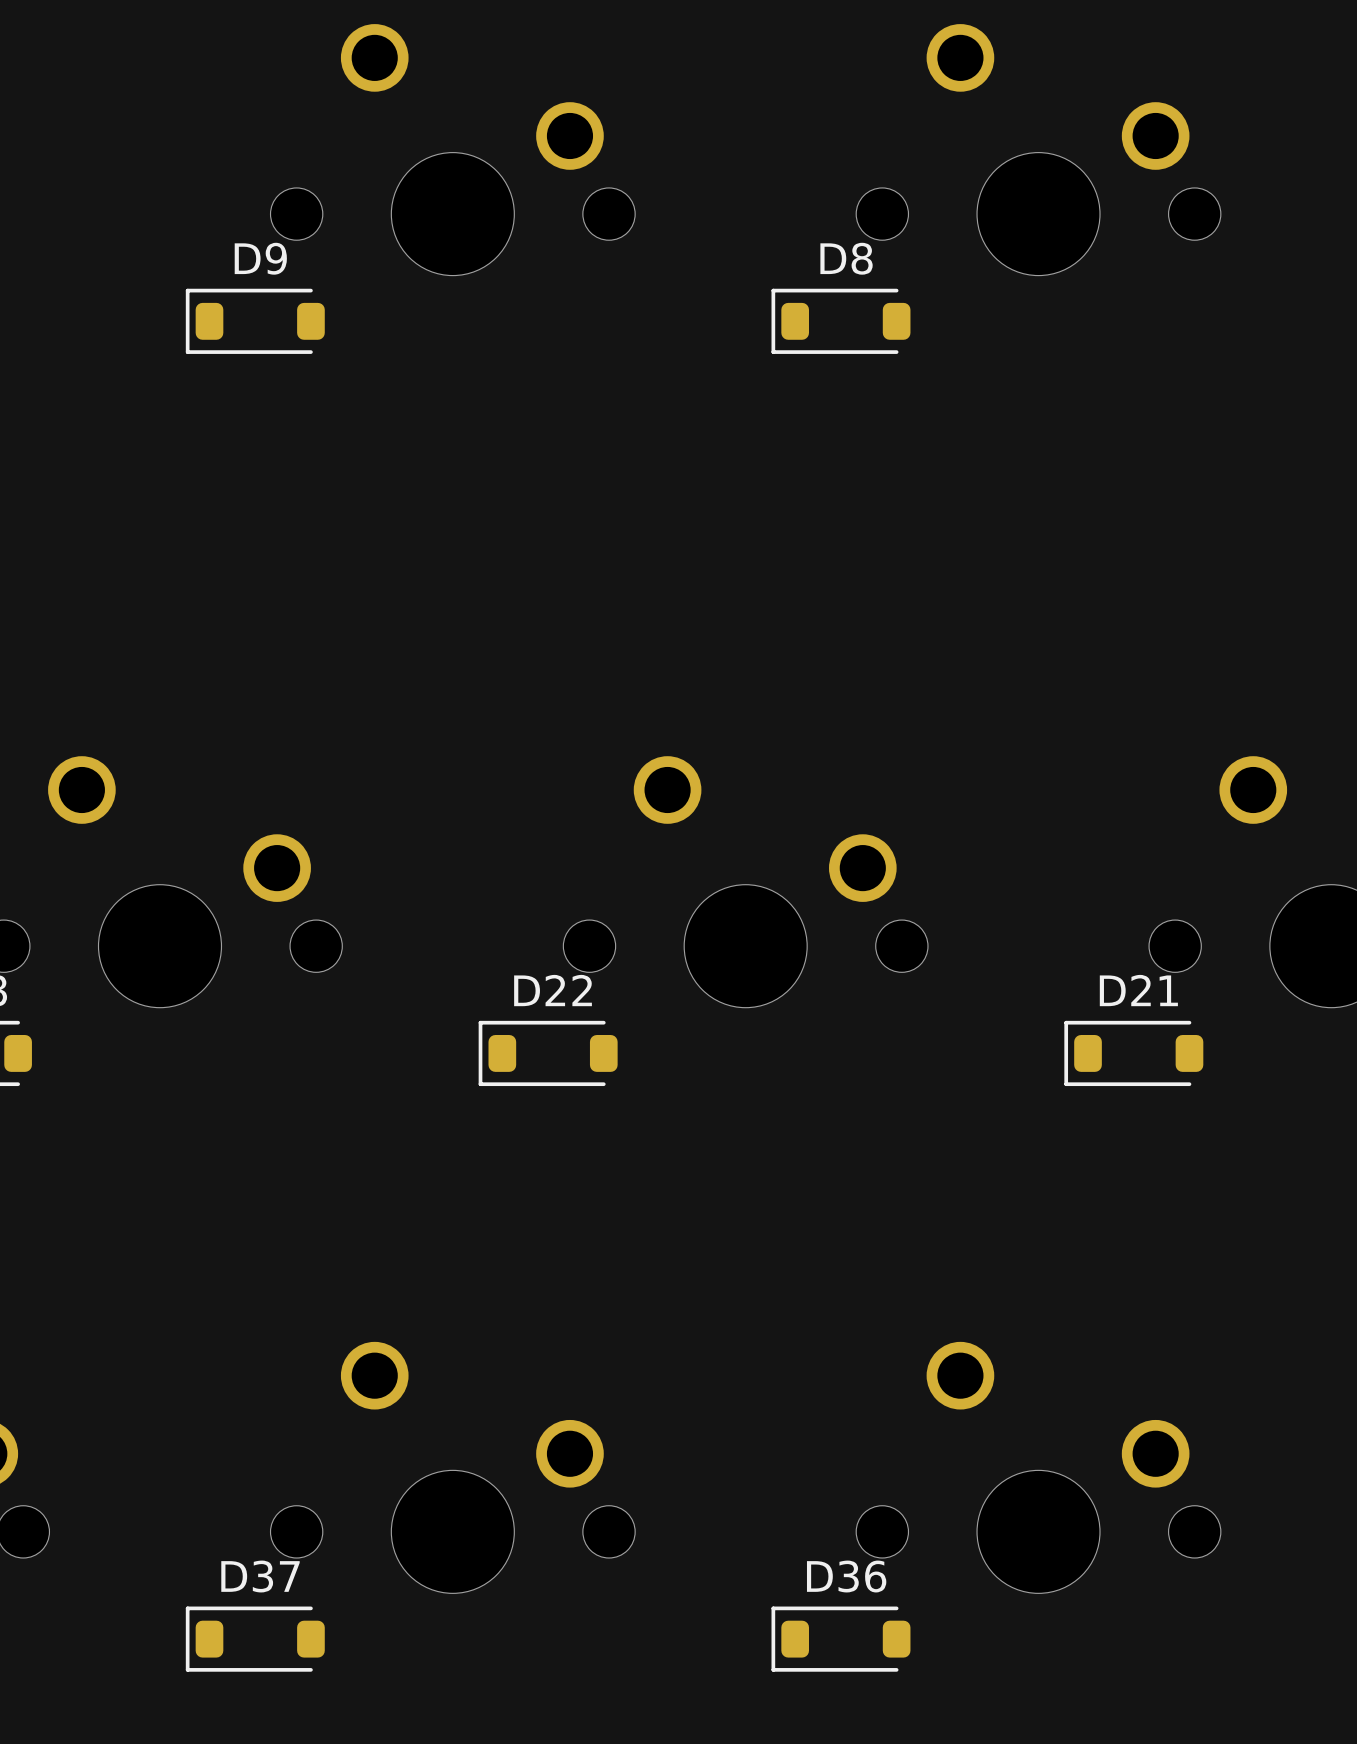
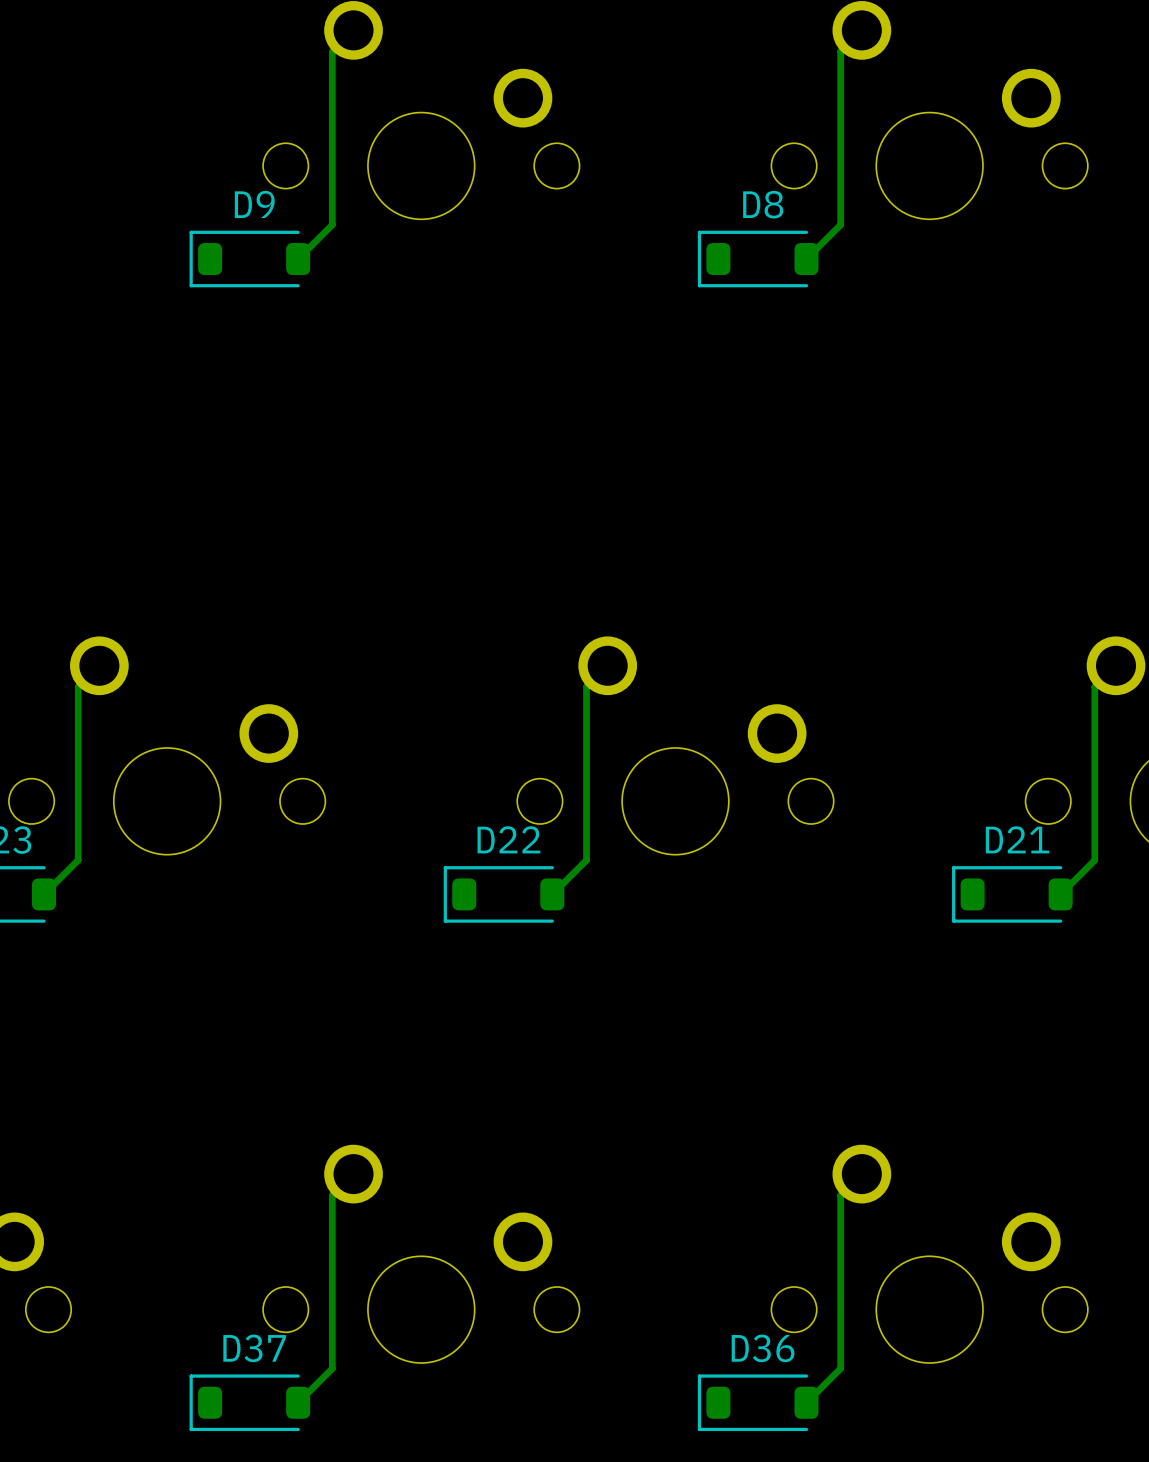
track: none -> (353, 30) (332, 51) (332, 224) (298, 259)
track: none -> (861, 30) (840, 51) (840, 224) (806, 259)
track: none -> (99, 665) (78, 686) (78, 860) (44, 894)
track: none -> (607, 665) (586, 686) (586, 860) (552, 894)
track: none -> (1116, 665) (1094, 686) (1094, 860) (1060, 894)
track: none -> (353, 1174) (332, 1195) (332, 1368) (298, 1402)
track: none -> (861, 1174) (840, 1195) (840, 1368) (806, 1402)

